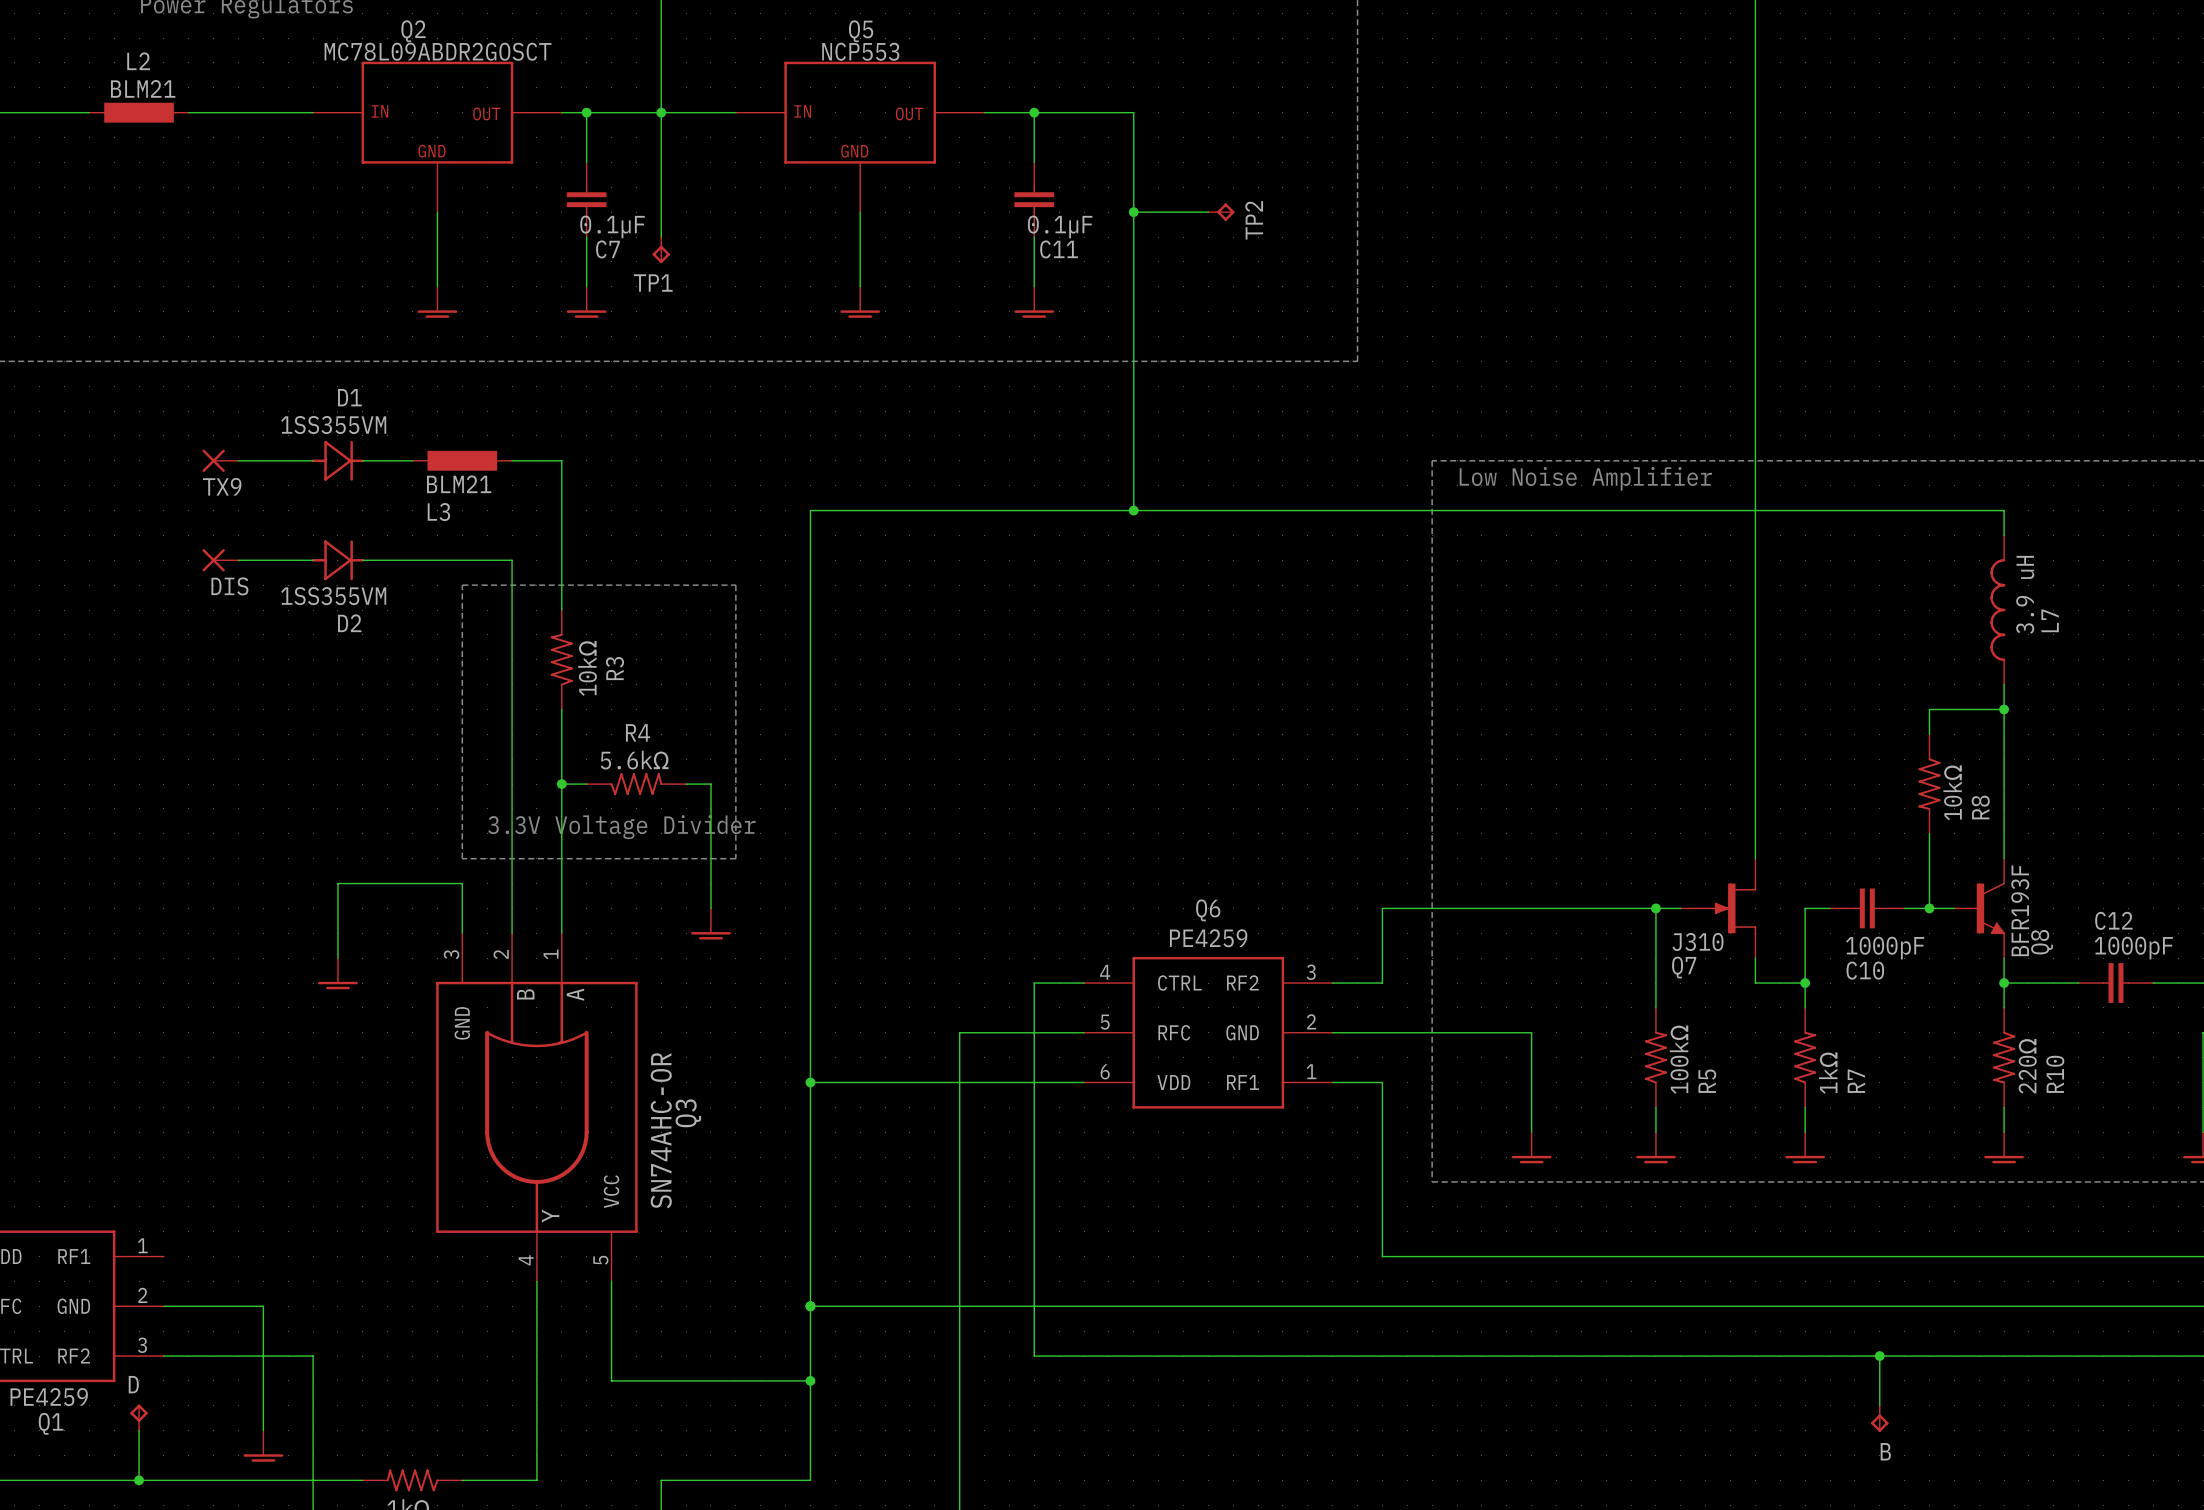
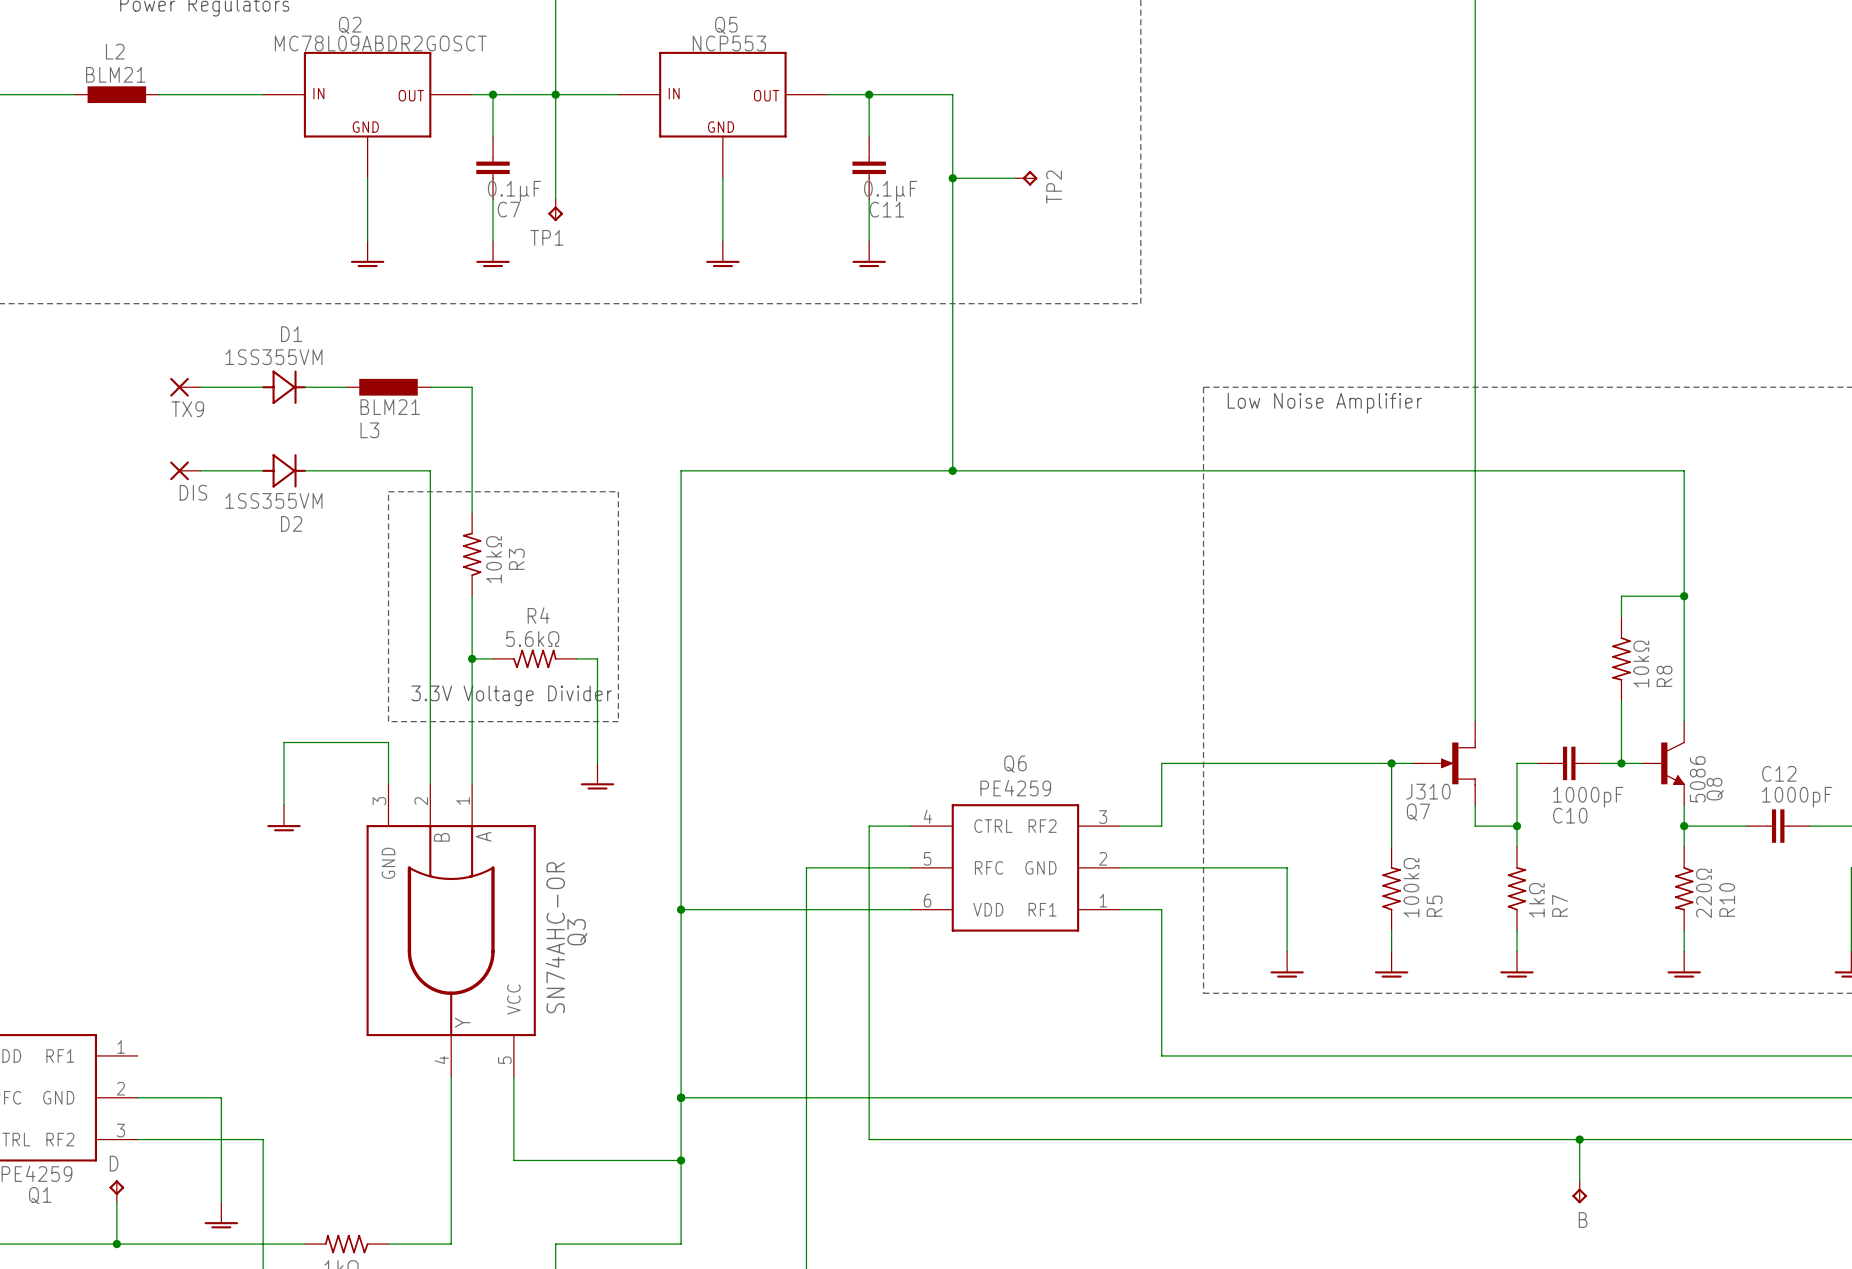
wire: none -> (952, 429) (952, 470)
junction position: (1133, 510) -> (952, 470)
wire: (2004, 535) (2004, 510) (810, 510) (810, 560) -> (1684, 575) (1684, 470) (681, 470)
L7: 3.9 uH (1997, 610) -> none
Q8 value: BFR193F (2020, 910) -> 5086 (1697, 779)

